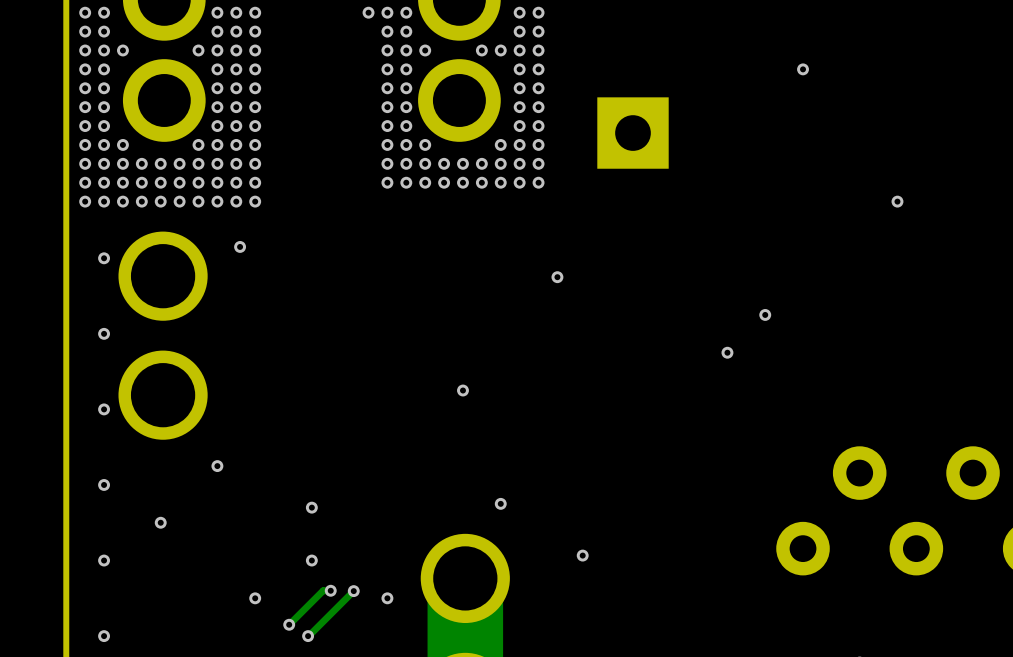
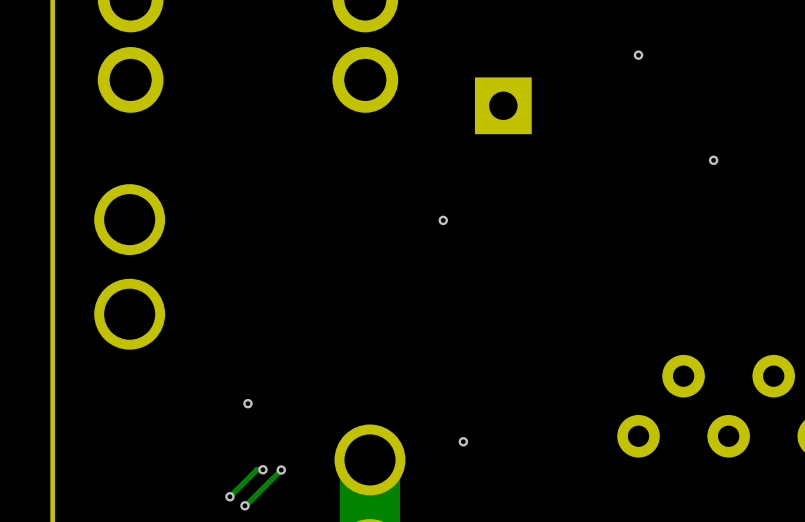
via: (85, 12) -> none
via: (104, 12) -> none
via: (217, 12) -> none
via: (236, 12) -> none
via: (255, 12) -> none
via: (368, 12) -> none
via: (387, 12) -> none
via: (406, 12) -> none
via: (519, 12) -> none
via: (538, 12) -> none
via: (85, 31) -> none
via: (104, 31) -> none
via: (217, 31) -> none
via: (236, 31) -> none
via: (255, 31) -> none
via: (387, 31) -> none
via: (406, 31) -> none
via: (519, 31) -> none
via: (538, 31) -> none
via: (85, 50) -> none
via: (104, 50) -> none
via: (122, 50) -> none
via: (198, 50) -> none
via: (217, 50) -> none
via: (236, 50) -> none
via: (255, 50) -> none
via: (387, 50) -> none
via: (406, 50) -> none
via: (425, 50) -> none
via: (481, 50) -> none
via: (500, 50) -> none
via: (519, 50) -> none
via: (538, 50) -> none
via: (85, 69) -> none
via: (104, 69) -> none
via: (217, 69) -> none
via: (236, 69) -> none
via: (255, 69) -> none
via: (387, 69) -> none
via: (406, 69) -> none
via: (519, 69) -> none
via: (538, 69) -> none
via: (85, 88) -> none
via: (104, 88) -> none
via: (217, 88) -> none
via: (236, 88) -> none
via: (255, 88) -> none
via: (387, 88) -> none
via: (406, 88) -> none
via: (519, 88) -> none
via: (538, 88) -> none
via: (85, 107) -> none
via: (104, 107) -> none
via: (217, 107) -> none
via: (236, 107) -> none
via: (255, 107) -> none
via: (387, 107) -> none
via: (406, 107) -> none
via: (519, 107) -> none
via: (538, 107) -> none
via: (85, 126) -> none
via: (104, 126) -> none
via: (217, 126) -> none
via: (236, 126) -> none
via: (255, 126) -> none
via: (387, 126) -> none
via: (406, 126) -> none
via: (519, 126) -> none
via: (538, 126) -> none
via: (85, 144) -> none
via: (104, 144) -> none
via: (122, 144) -> none
via: (198, 144) -> none
via: (217, 144) -> none
via: (236, 144) -> none
via: (255, 144) -> none
via: (387, 144) -> none
via: (406, 144) -> none
via: (425, 144) -> none
via: (500, 144) -> none
via: (519, 144) -> none
via: (538, 144) -> none
via: (85, 163) -> none
via: (104, 163) -> none
via: (122, 163) -> none
via: (141, 163) -> none
via: (160, 163) -> none
via: (179, 163) -> none
via: (198, 163) -> none
via: (217, 163) -> none
via: (236, 163) -> none
via: (255, 163) -> none
via: (387, 163) -> none
via: (406, 163) -> none
via: (425, 163) -> none
via: (444, 163) -> none
via: (462, 163) -> none
via: (481, 163) -> none
via: (500, 163) -> none
via: (519, 163) -> none
via: (538, 163) -> none
via: (85, 182) -> none
via: (104, 182) -> none
via: (122, 182) -> none
via: (141, 182) -> none
via: (160, 182) -> none
via: (179, 182) -> none
via: (198, 182) -> none
via: (217, 182) -> none
via: (236, 182) -> none
via: (255, 182) -> none
via: (387, 182) -> none
via: (406, 182) -> none
via: (425, 182) -> none
via: (444, 182) -> none
via: (462, 182) -> none
via: (481, 182) -> none
via: (500, 182) -> none
via: (519, 182) -> none
via: (538, 182) -> none
via: (85, 201) -> none
via: (104, 201) -> none
via: (122, 201) -> none
via: (141, 201) -> none
via: (160, 201) -> none
via: (179, 201) -> none
via: (198, 201) -> none
via: (217, 201) -> none
via: (236, 201) -> none
via: (255, 201) -> none
via: (240, 246) -> none
via: (104, 258) -> none
via: (765, 314) -> none
via: (104, 333) -> none
via: (727, 352) -> none
via: (462, 390) -> none
via: (104, 409) -> none
via: (217, 466) -> none
via: (104, 484) -> none
via: (500, 503) -> none
via: (160, 522) -> none
via: (104, 560) -> none
via: (311, 560) -> none
via: (255, 598) -> none
via: (387, 598) -> none
via: (104, 636) -> none

